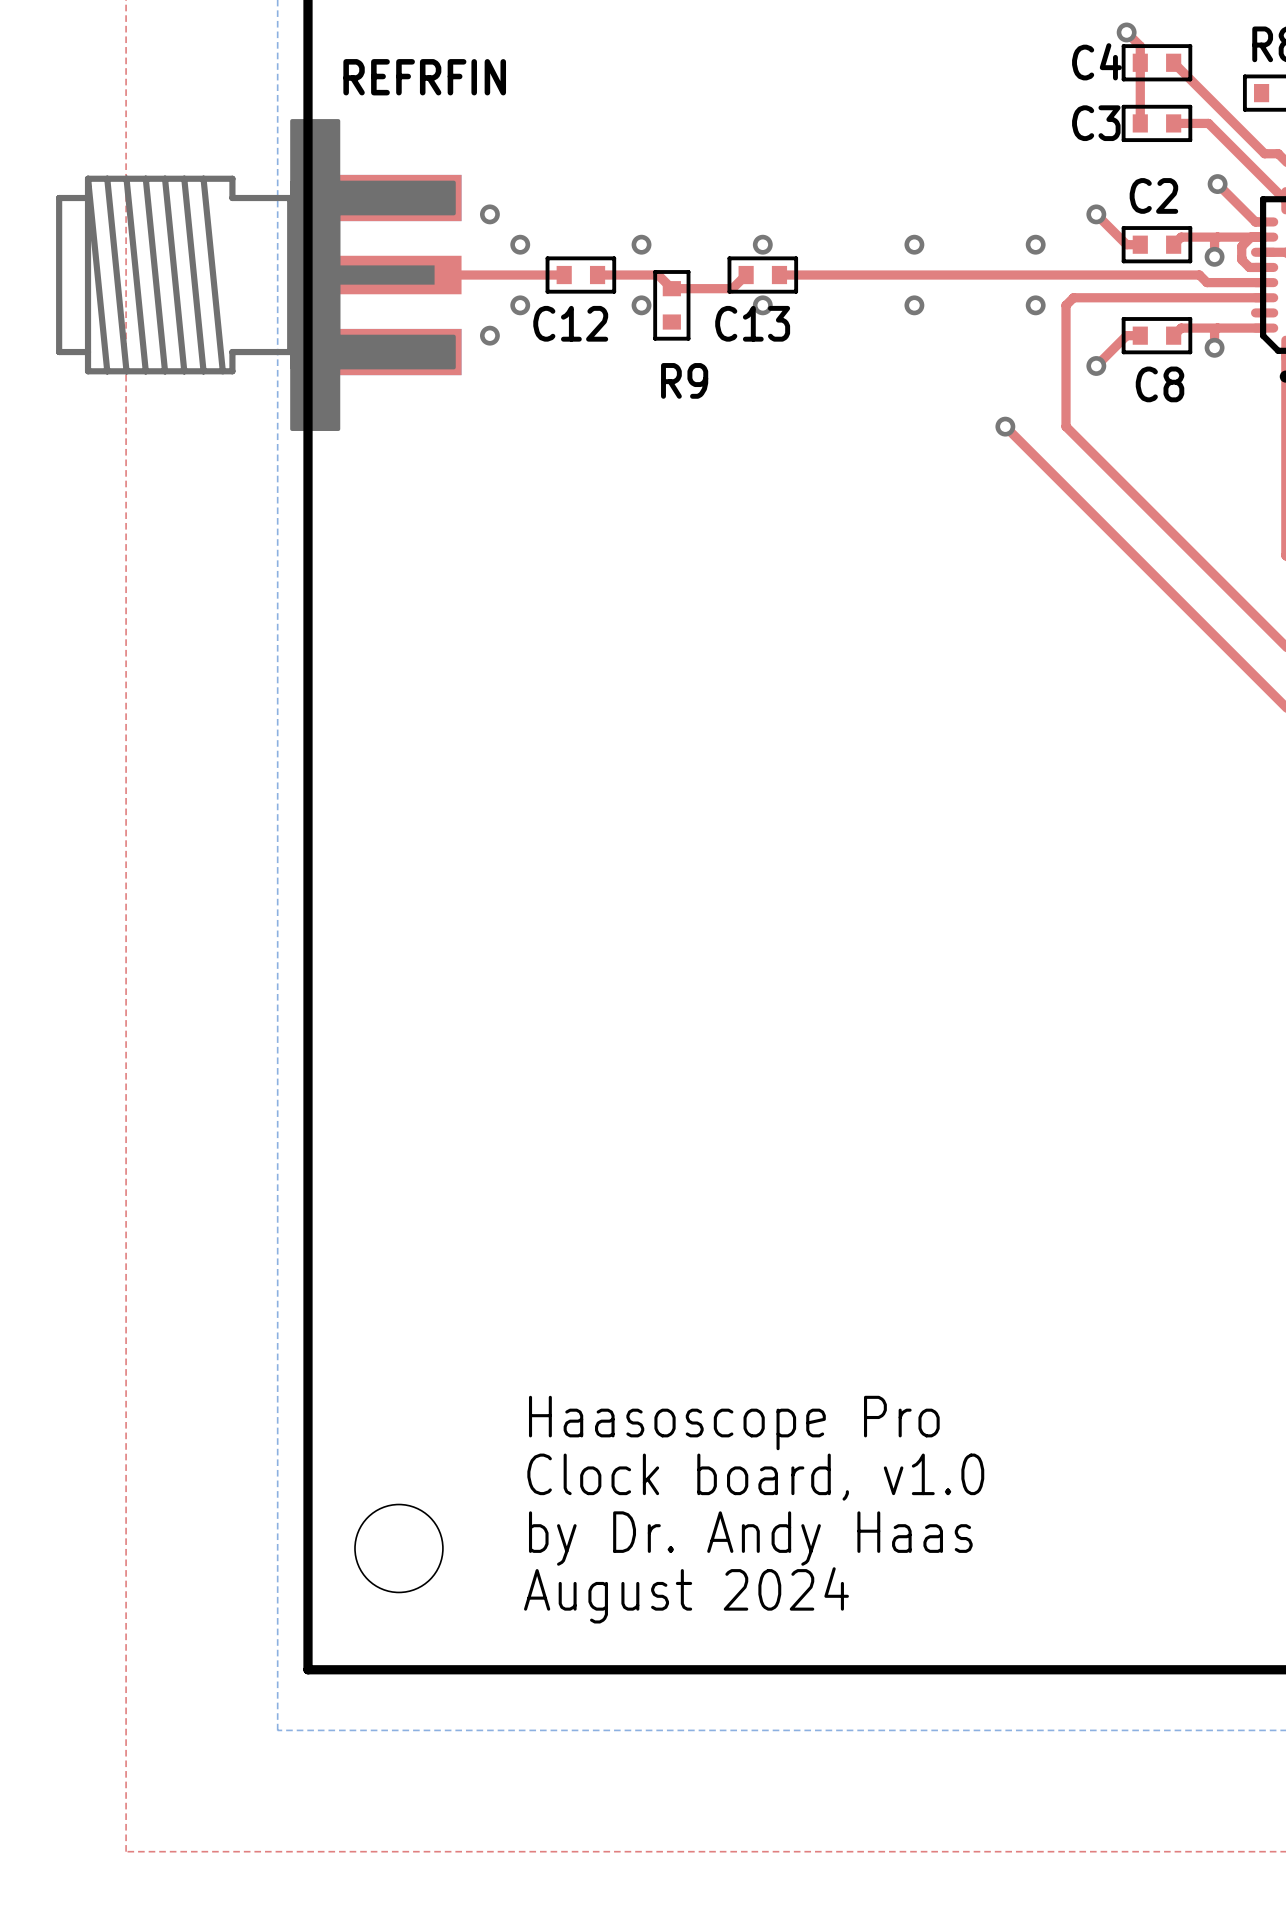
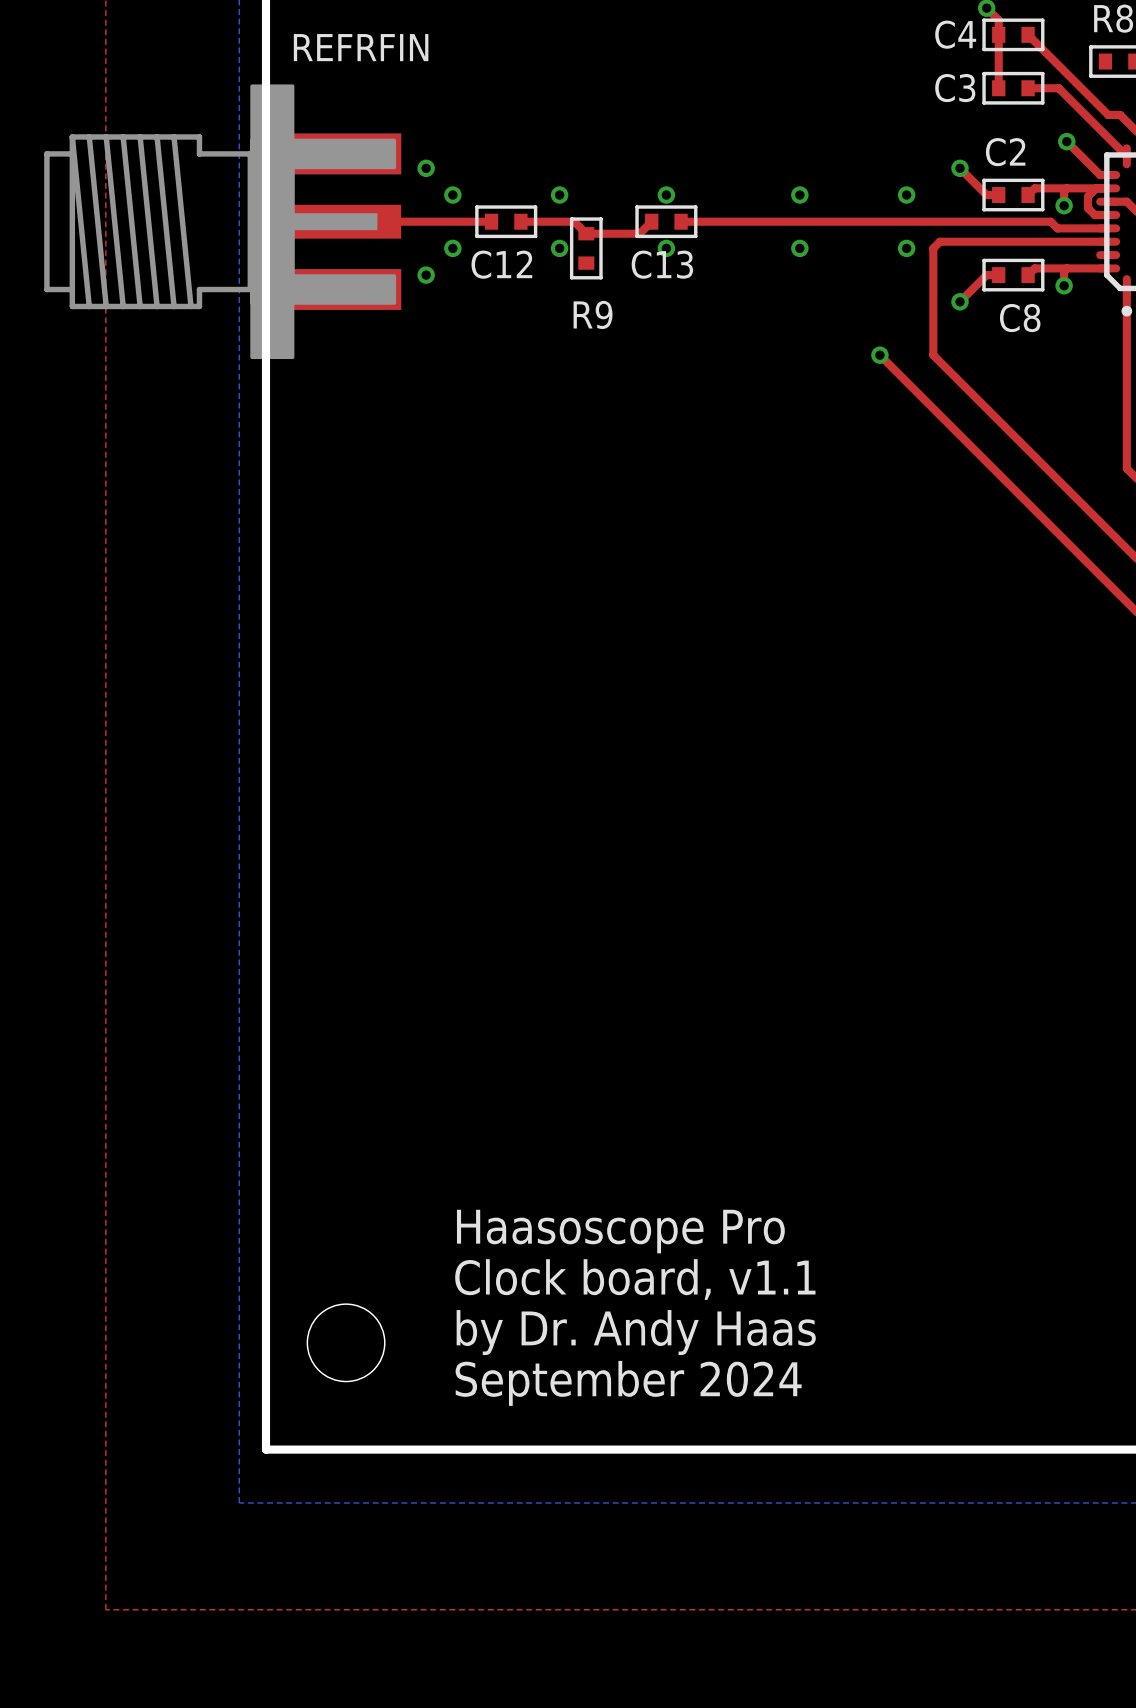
text: Clock board, v1.0 (755, 1477) -> Clock board, v1.1 (635, 1279)
text: August 2024 (686, 1595) -> September 2024 (628, 1383)

